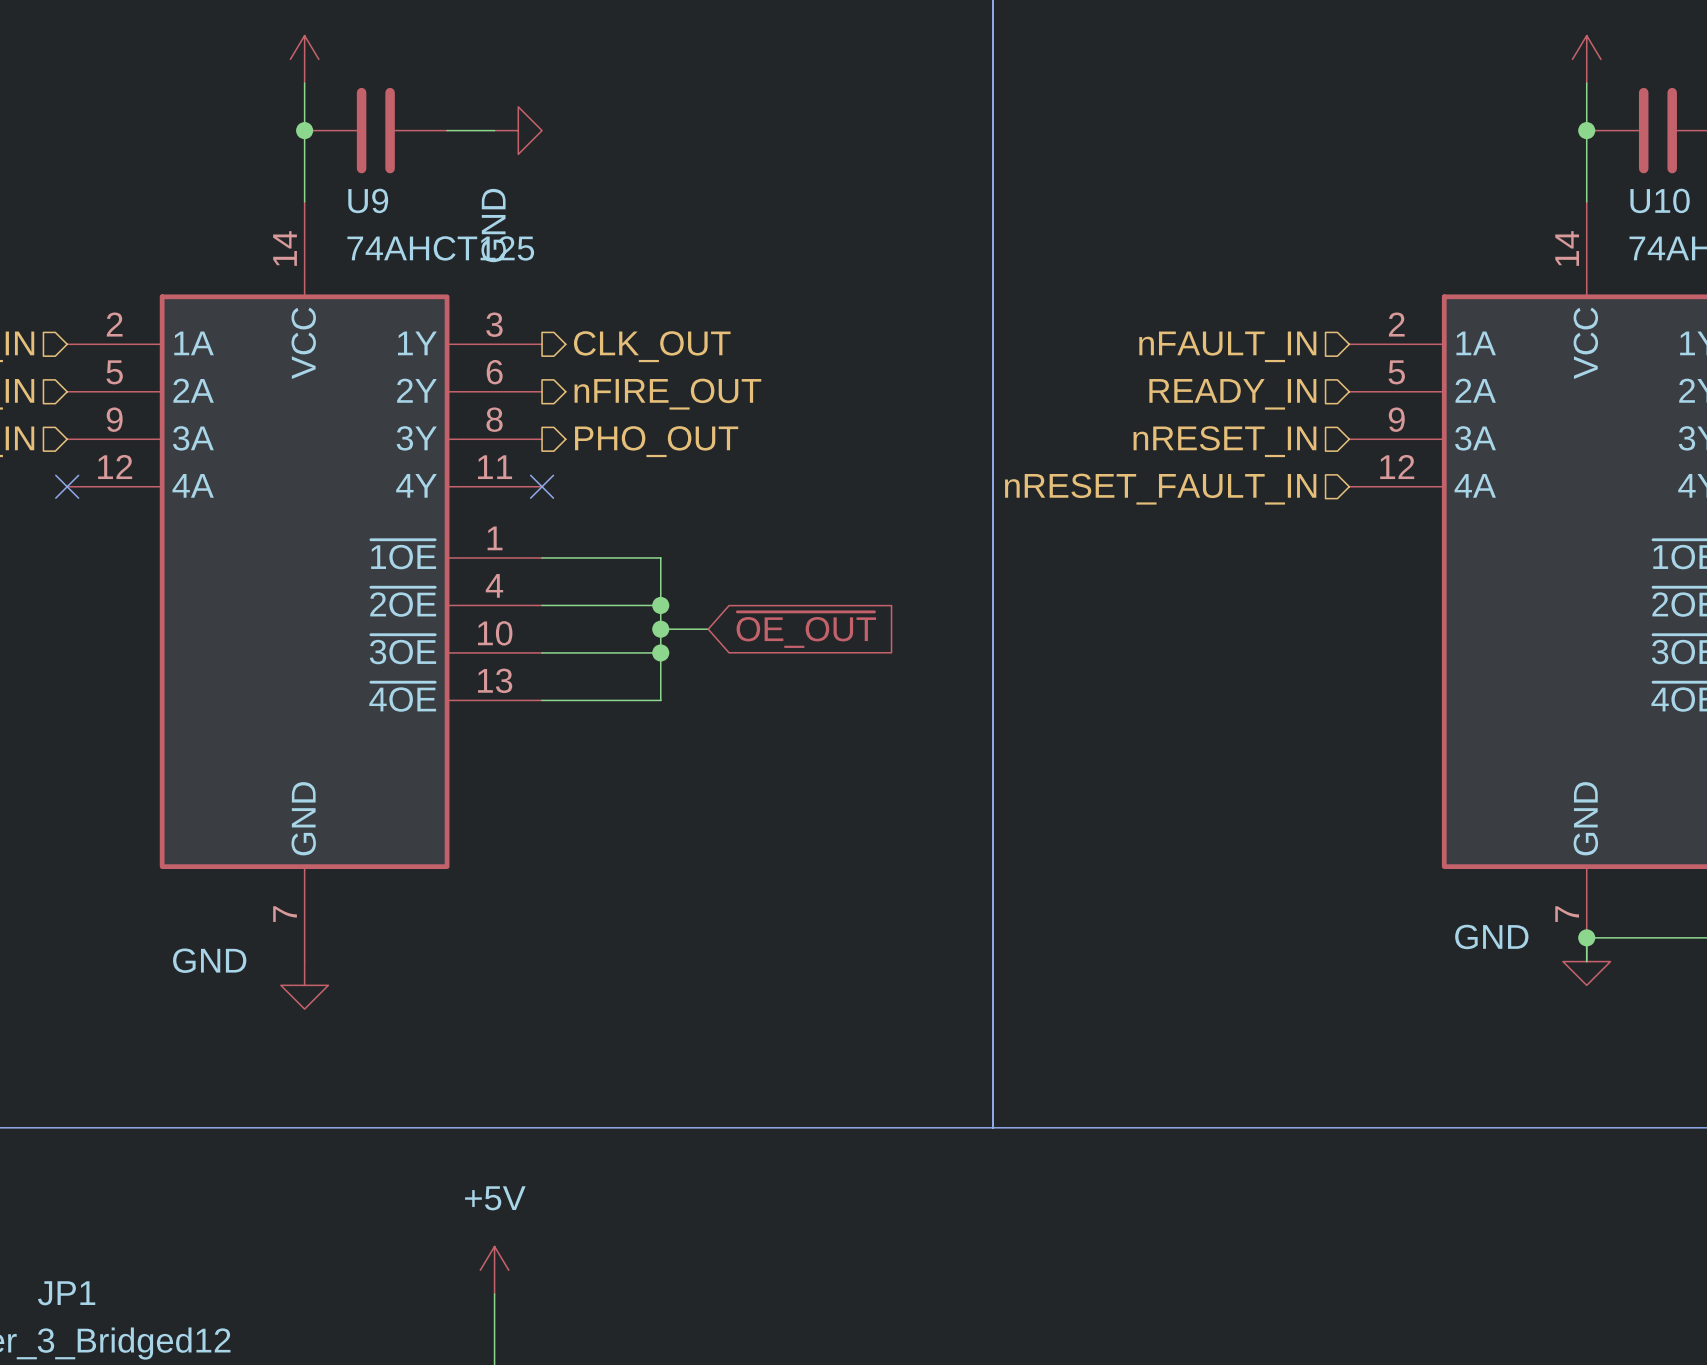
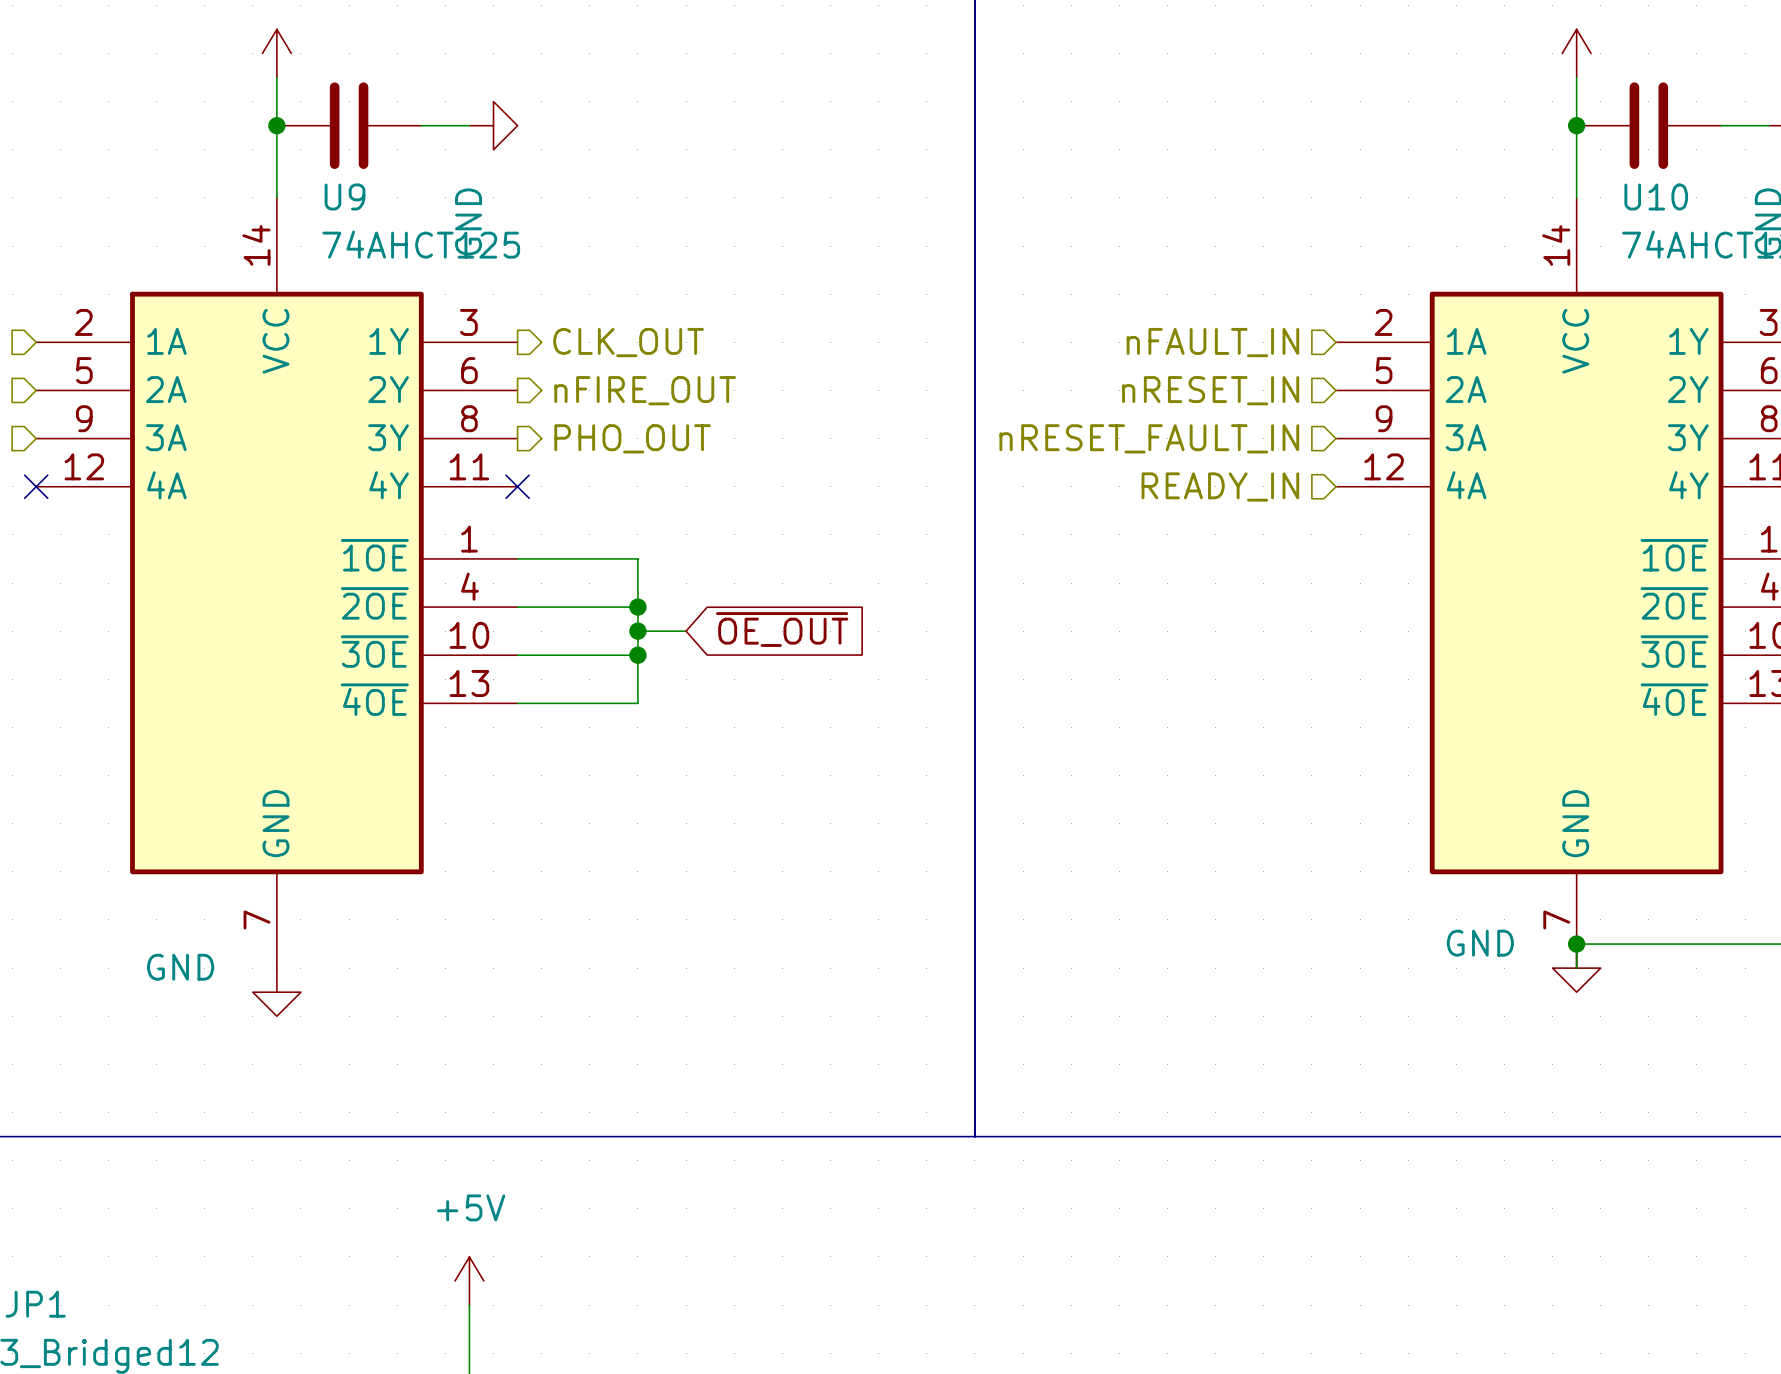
hierarchical label: READY_IN (1232, 394) -> nRESET_IN (1210, 390)
hierarchical label: nRESET_IN (1224, 441) -> nRESET_FAULT_IN (1149, 438)
hierarchical label: nRESET_FAULT_IN (1160, 489) -> READY_IN (1220, 486)

